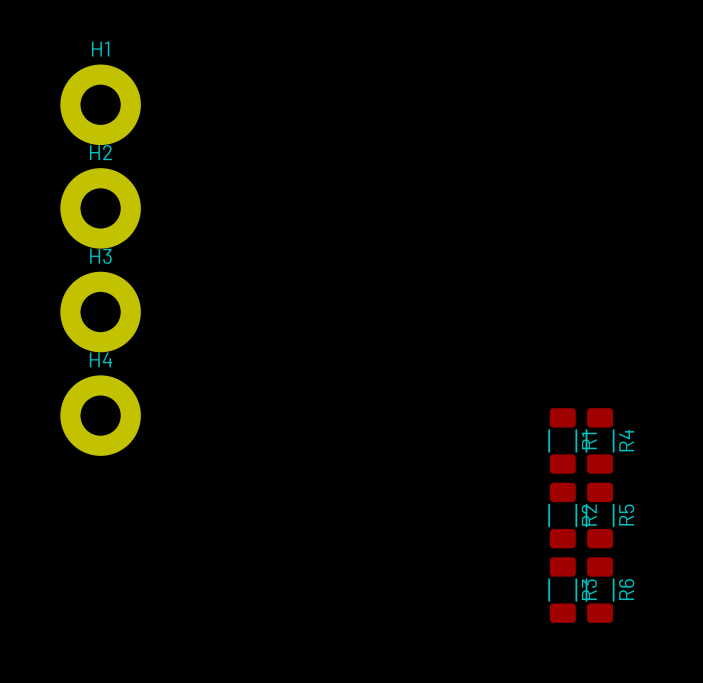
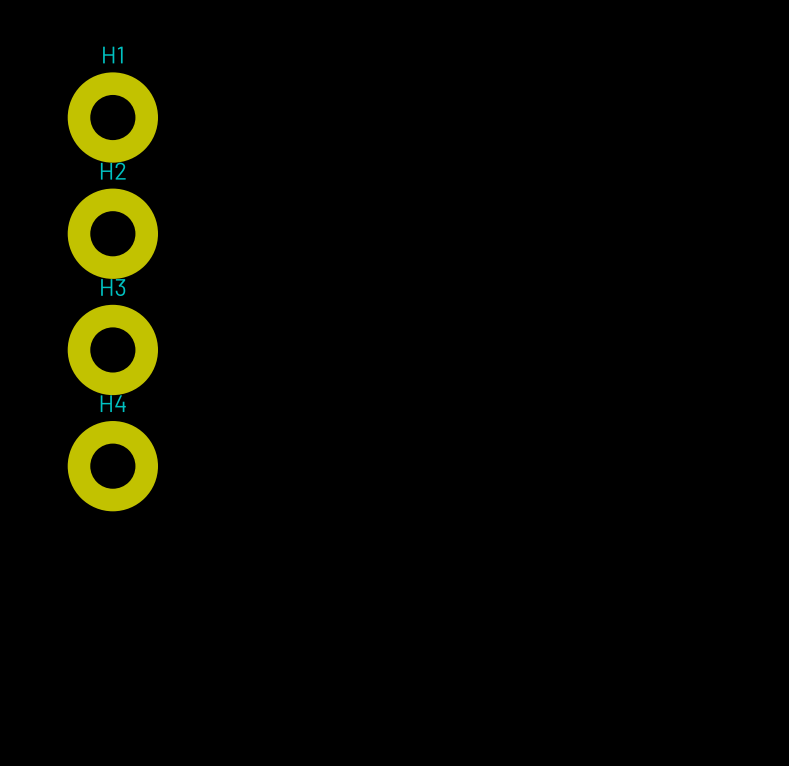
R1: (562, 440) -> none
R4: (600, 440) -> none
R2: (562, 515) -> none
R5: (600, 515) -> none
R3: (562, 590) -> none
R6: (600, 590) -> none

